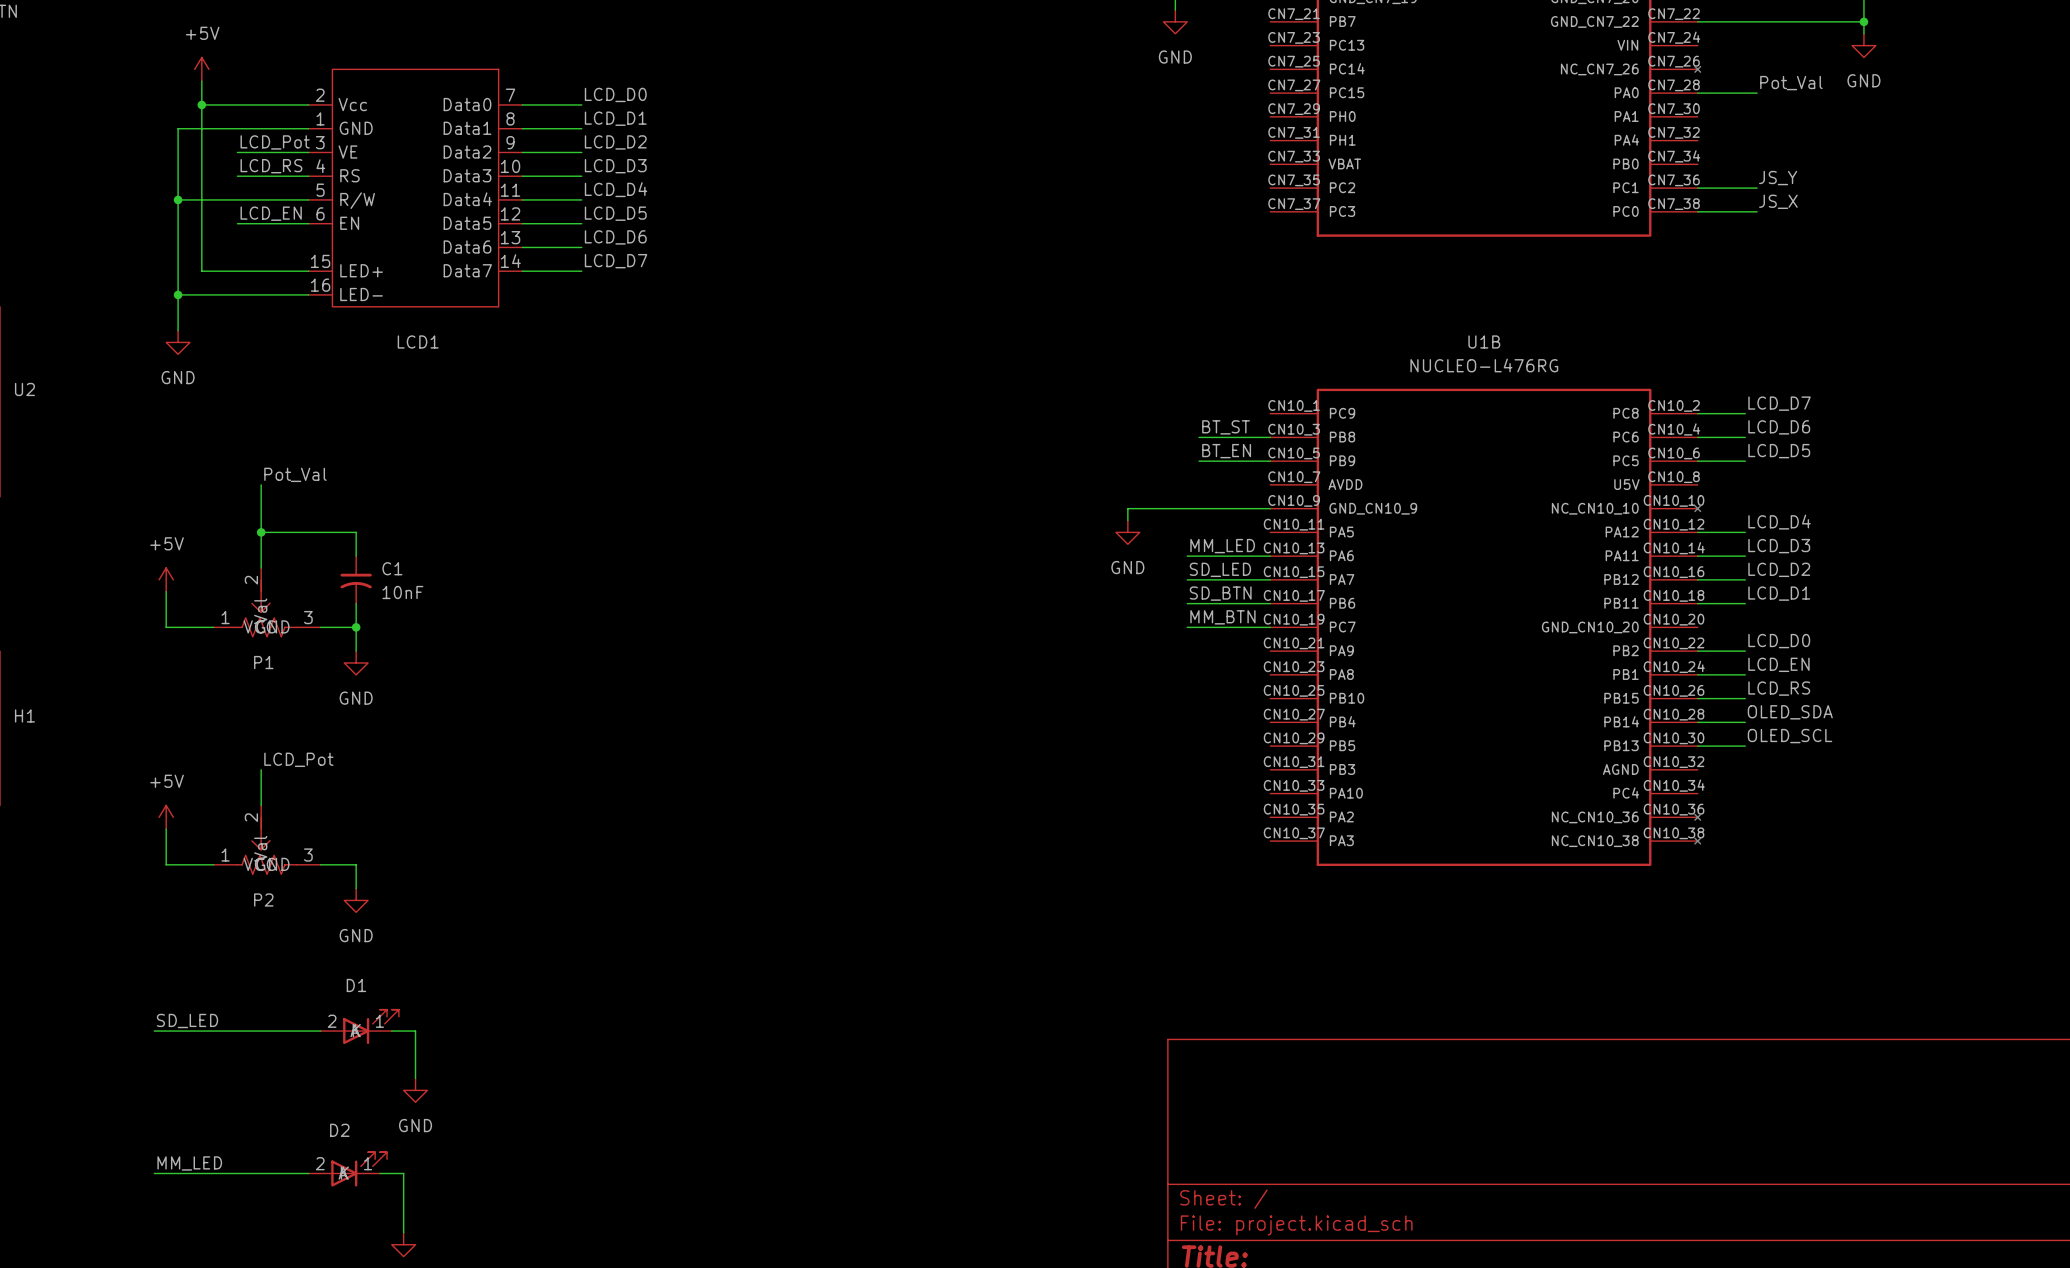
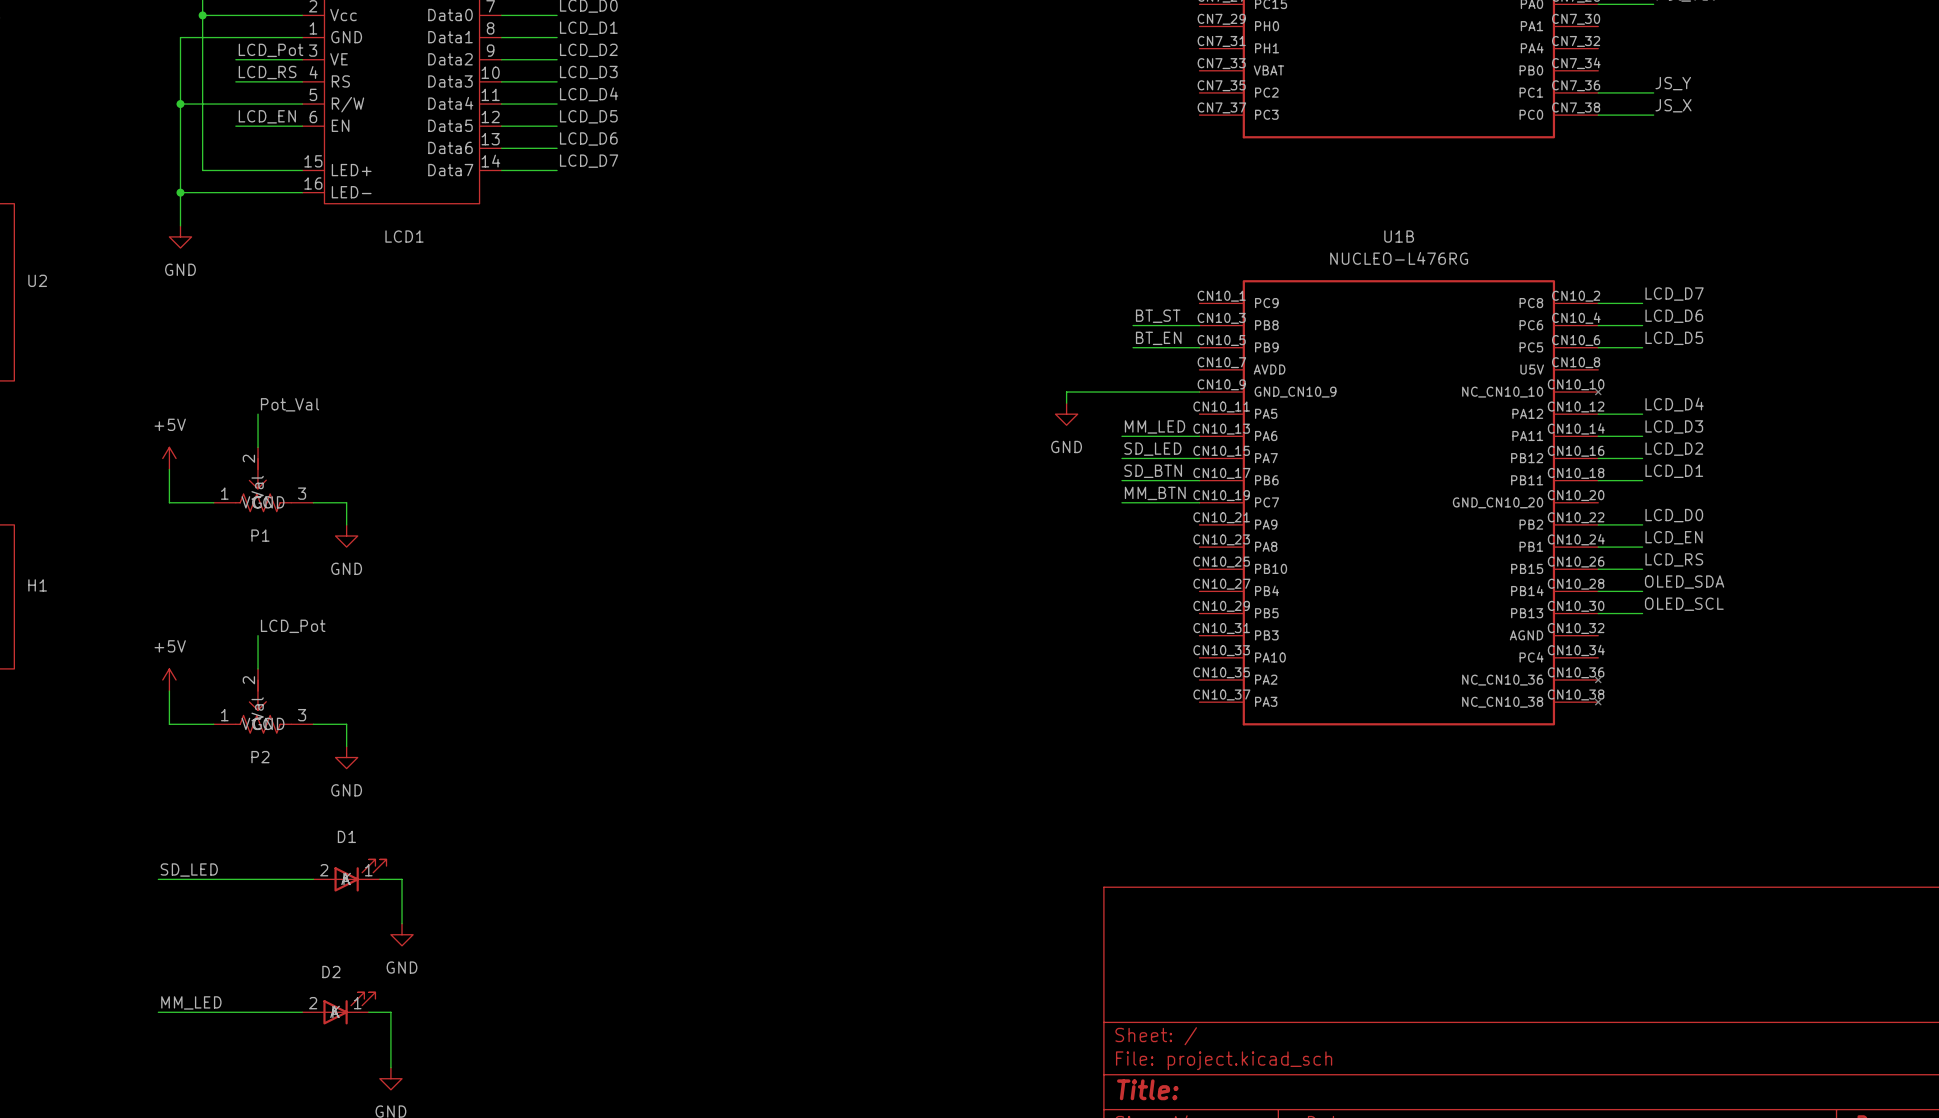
label position: Pot_Val (295, 474) -> Pot_Val (290, 404)
wire: (261, 484) (261, 532) (356, 532) (356, 556) -> none
junction: (261, 532) -> none
C1: 10nF (356, 579) -> none
wire: (356, 603) (356, 627) -> none
junction: (356, 627) -> none

